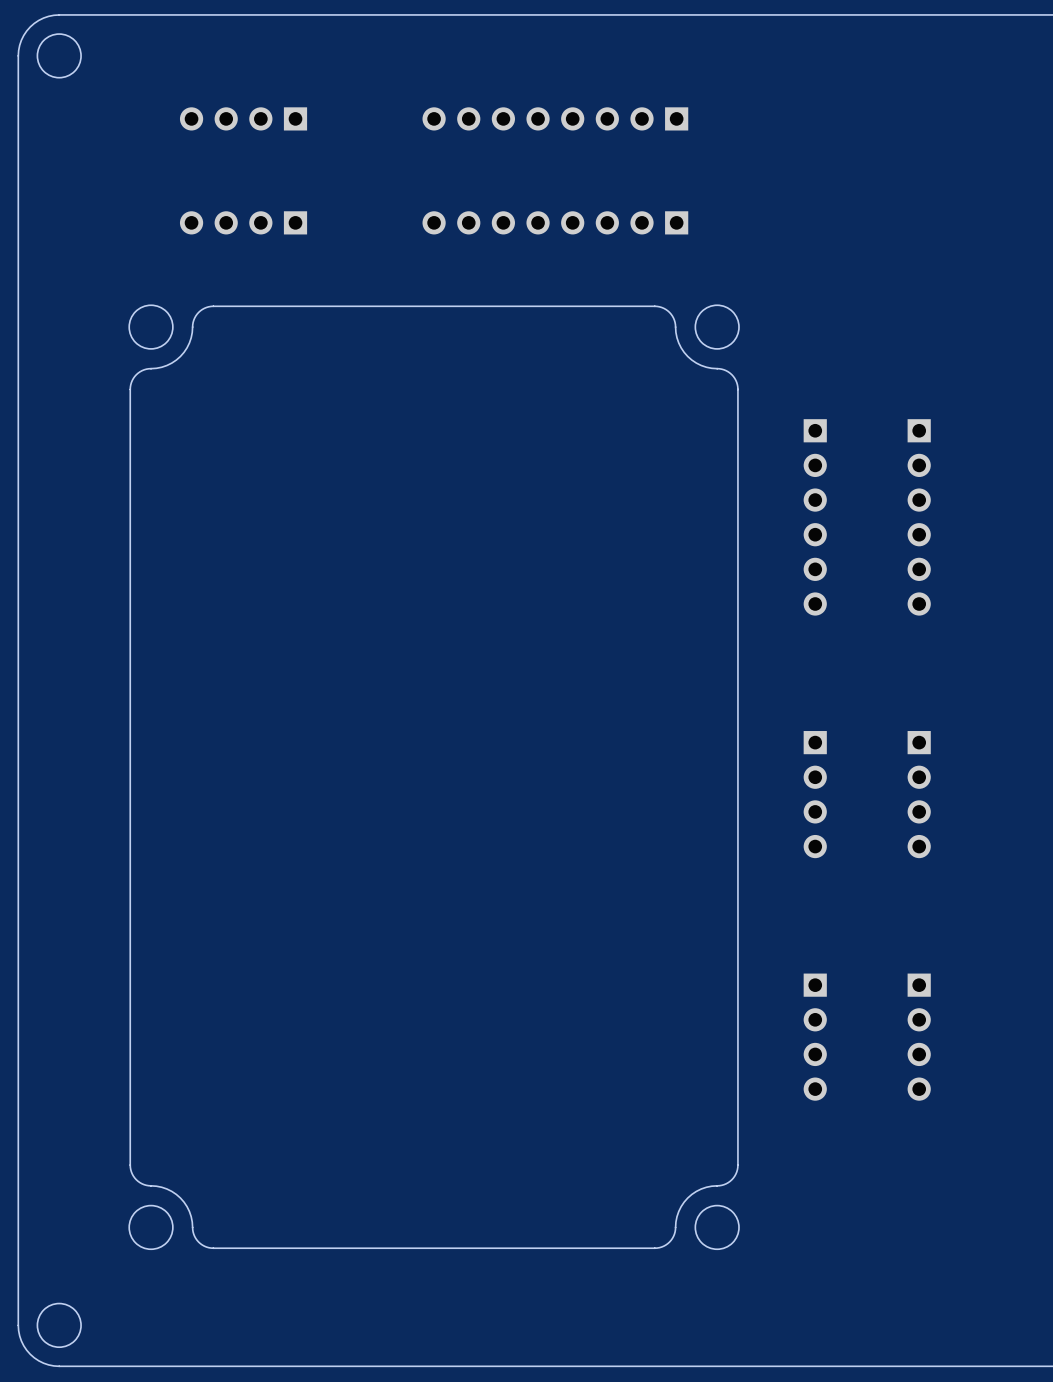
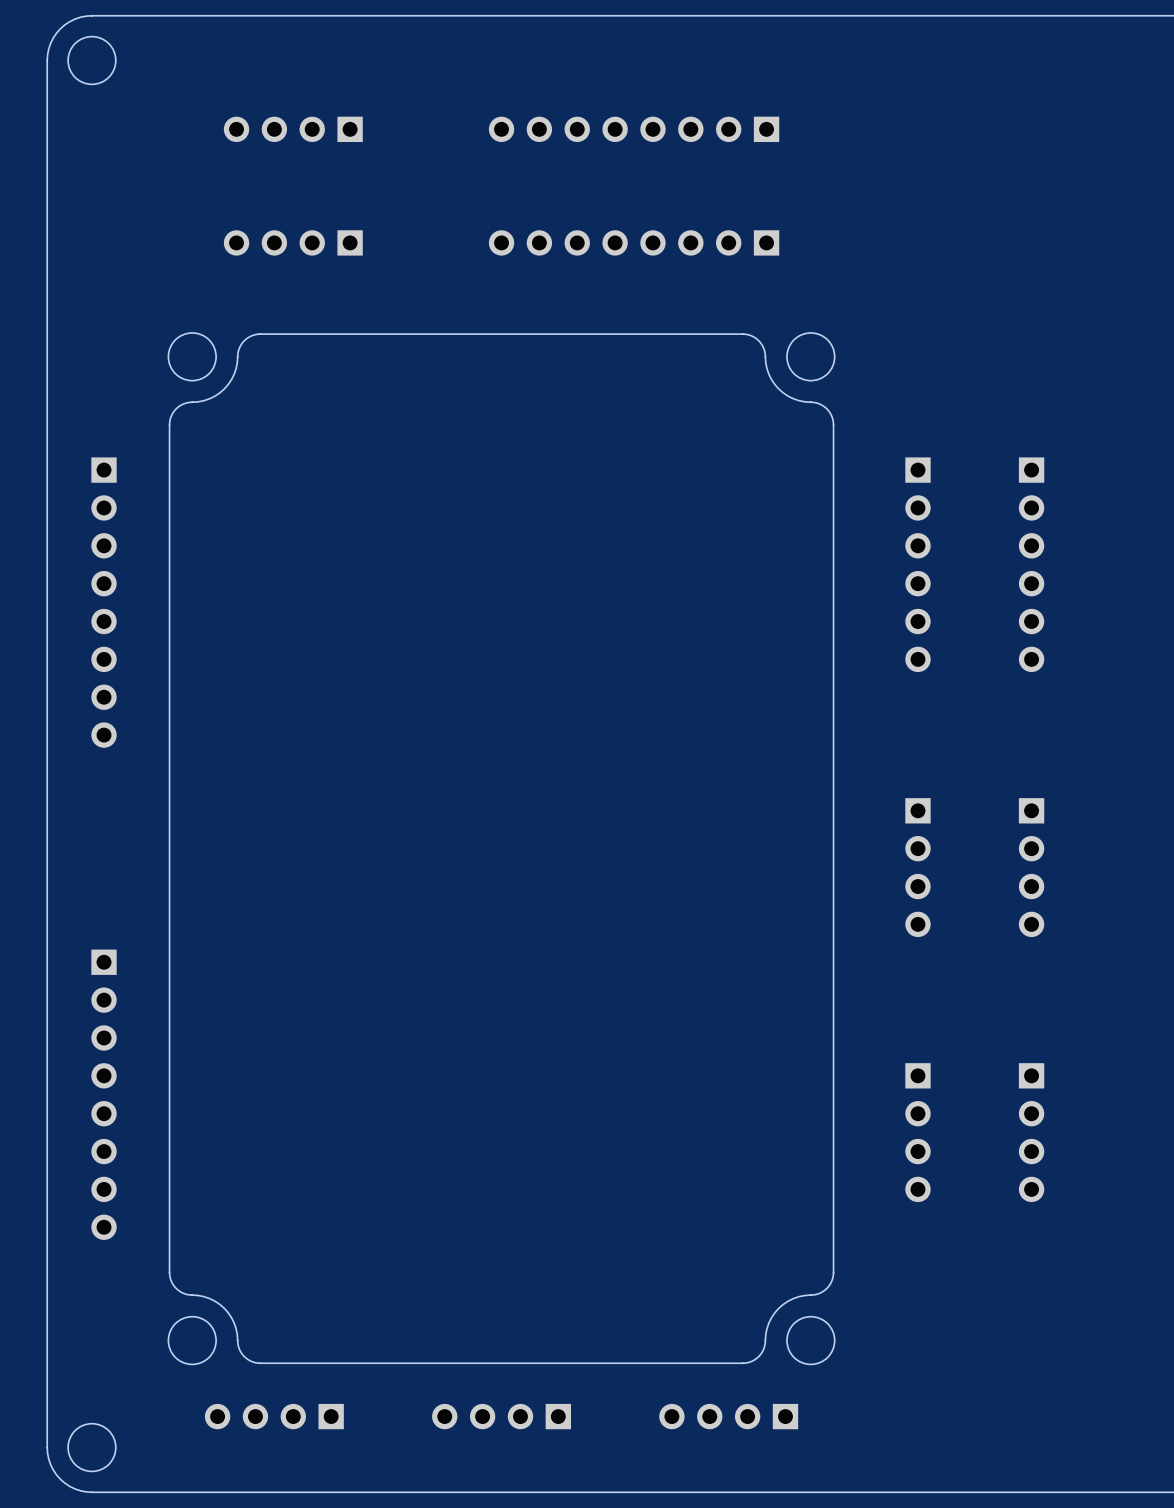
part: none -> (104, 602)
part: none -> (104, 1094)
part: none -> (274, 1416)
part: none -> (501, 1416)
part: none -> (728, 1416)

